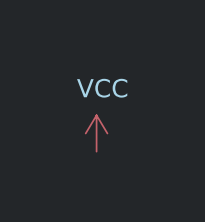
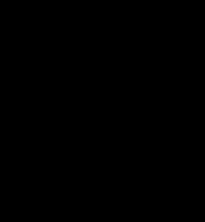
power symbol: VCC (96, 133) -> none

